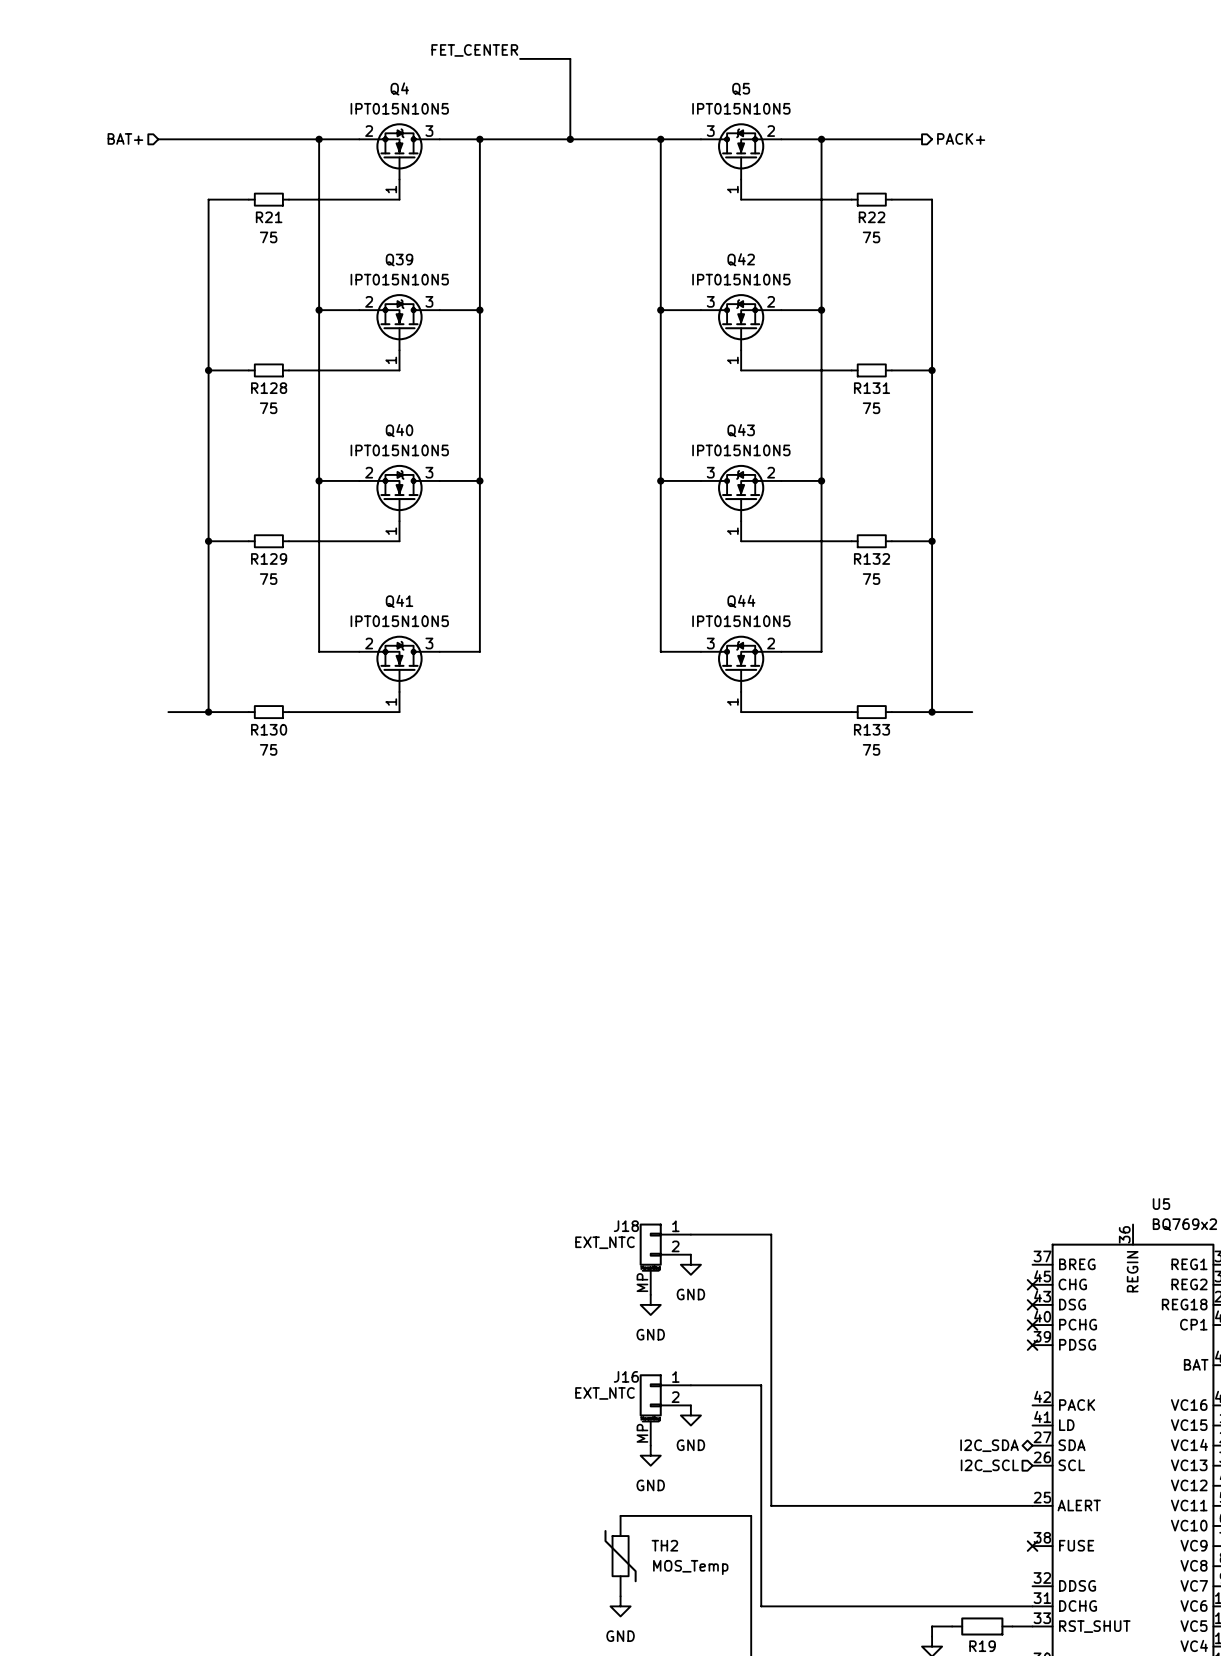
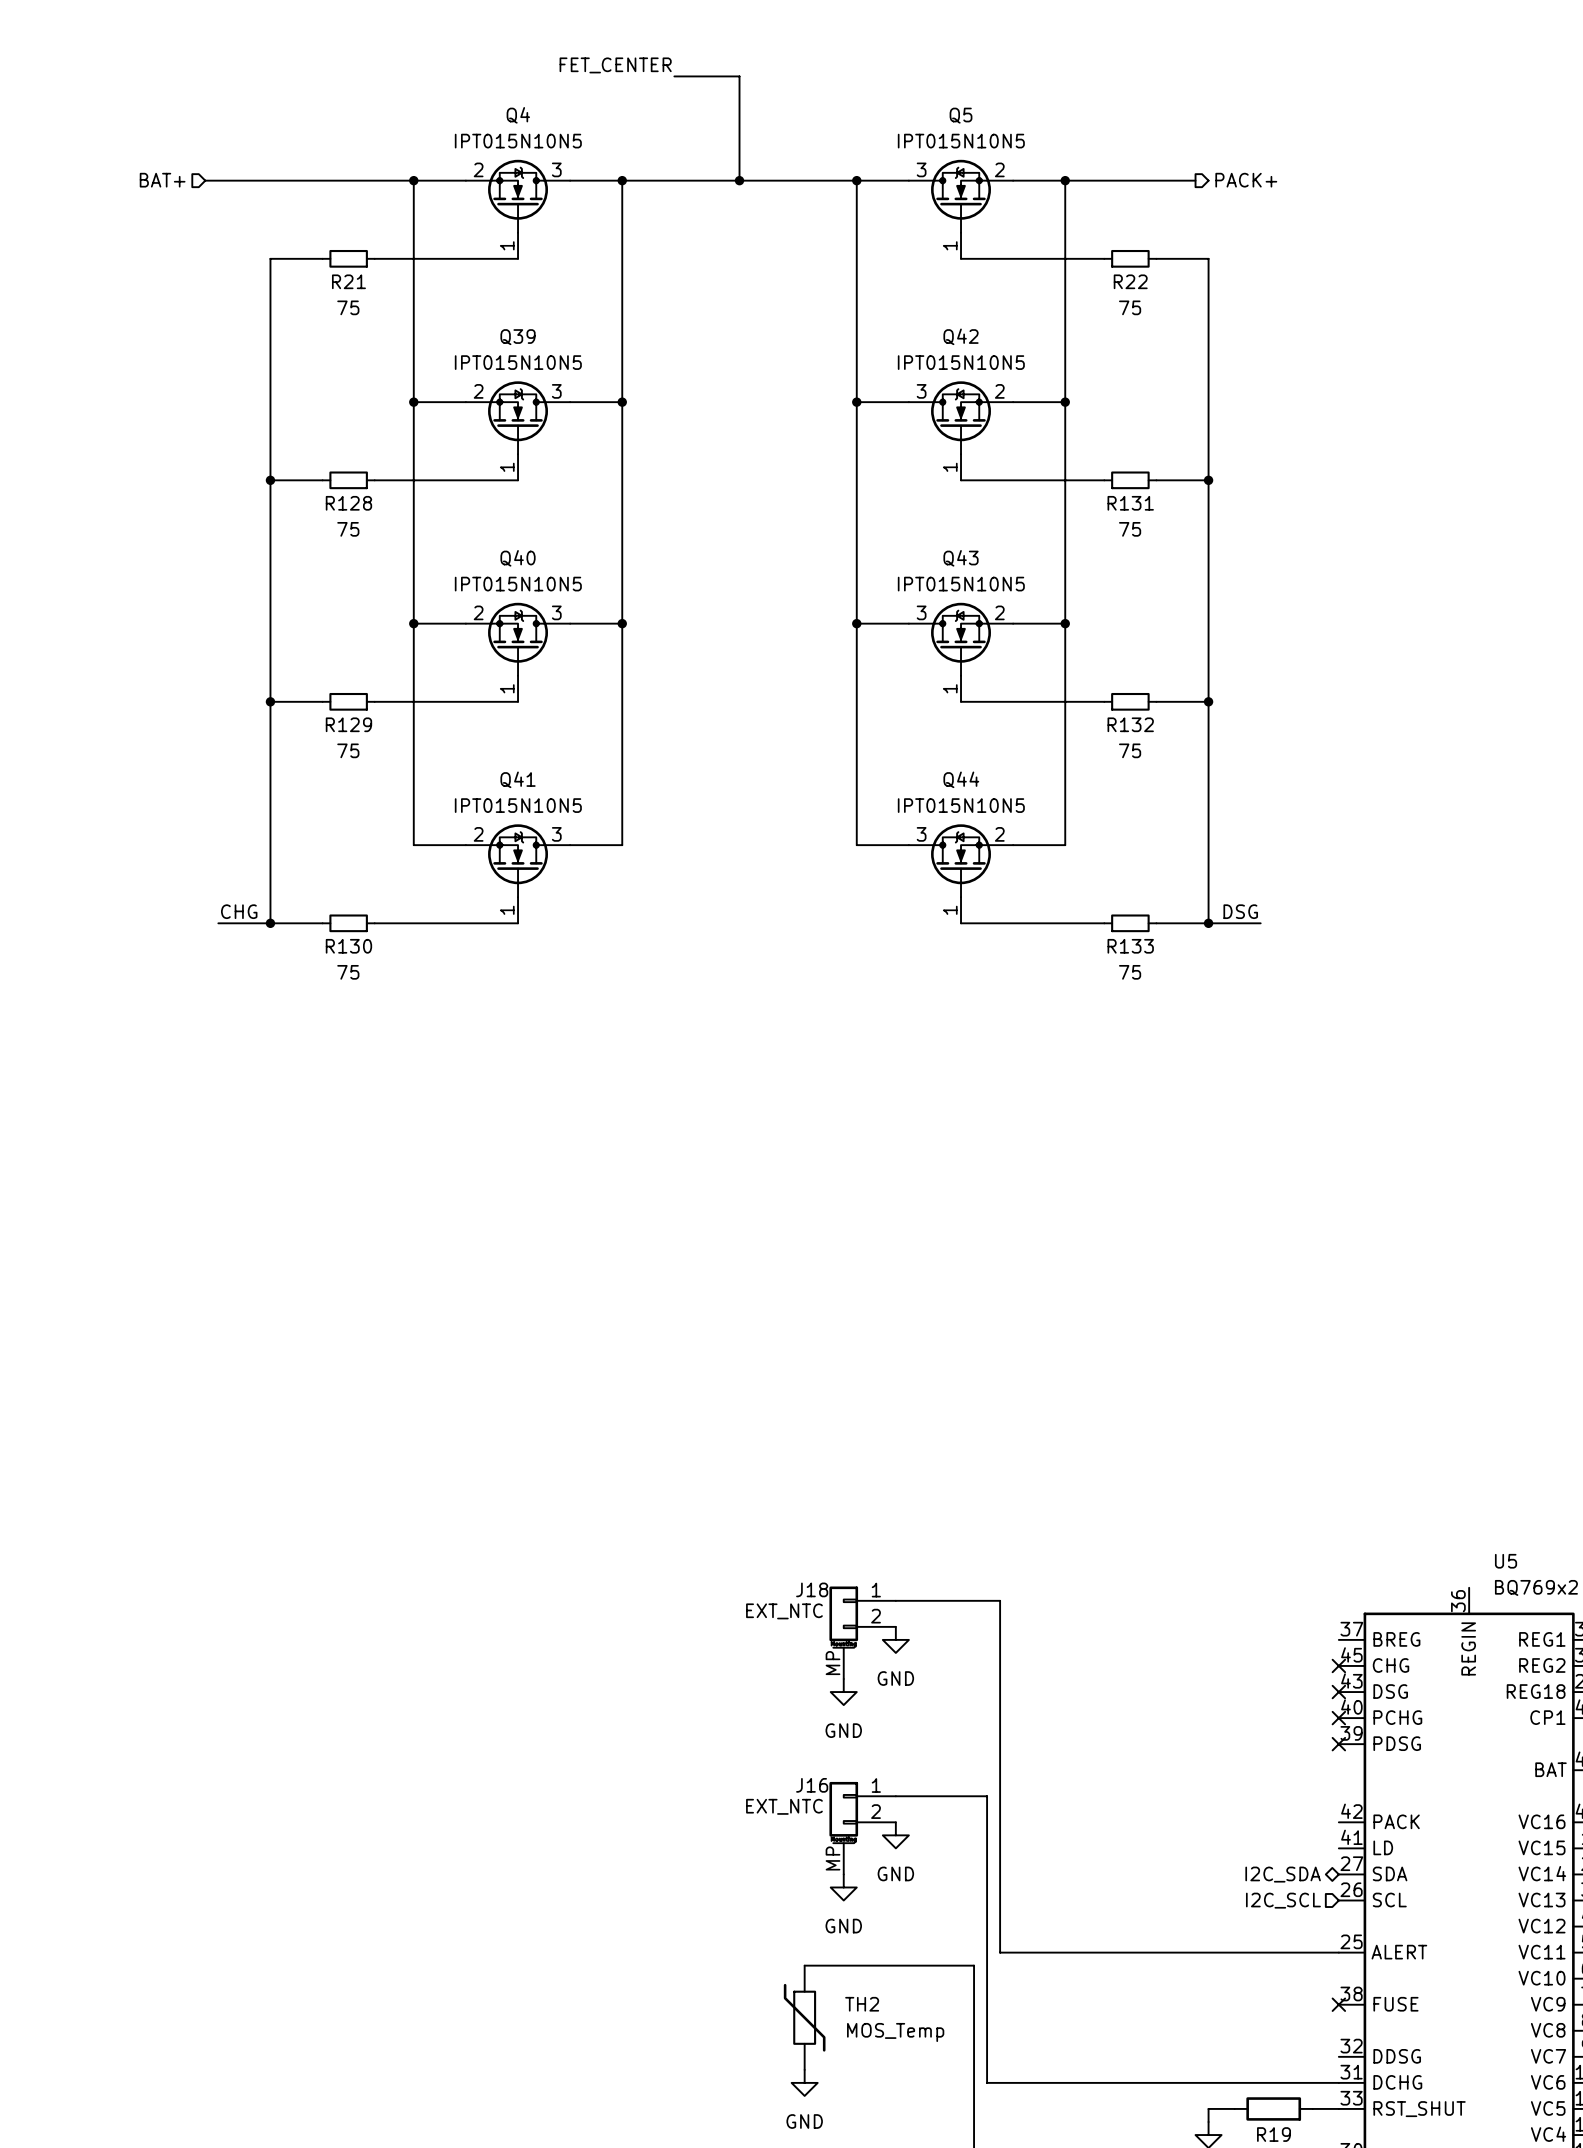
label: none -> CHG (239, 911)
label: none -> DSG (1240, 911)

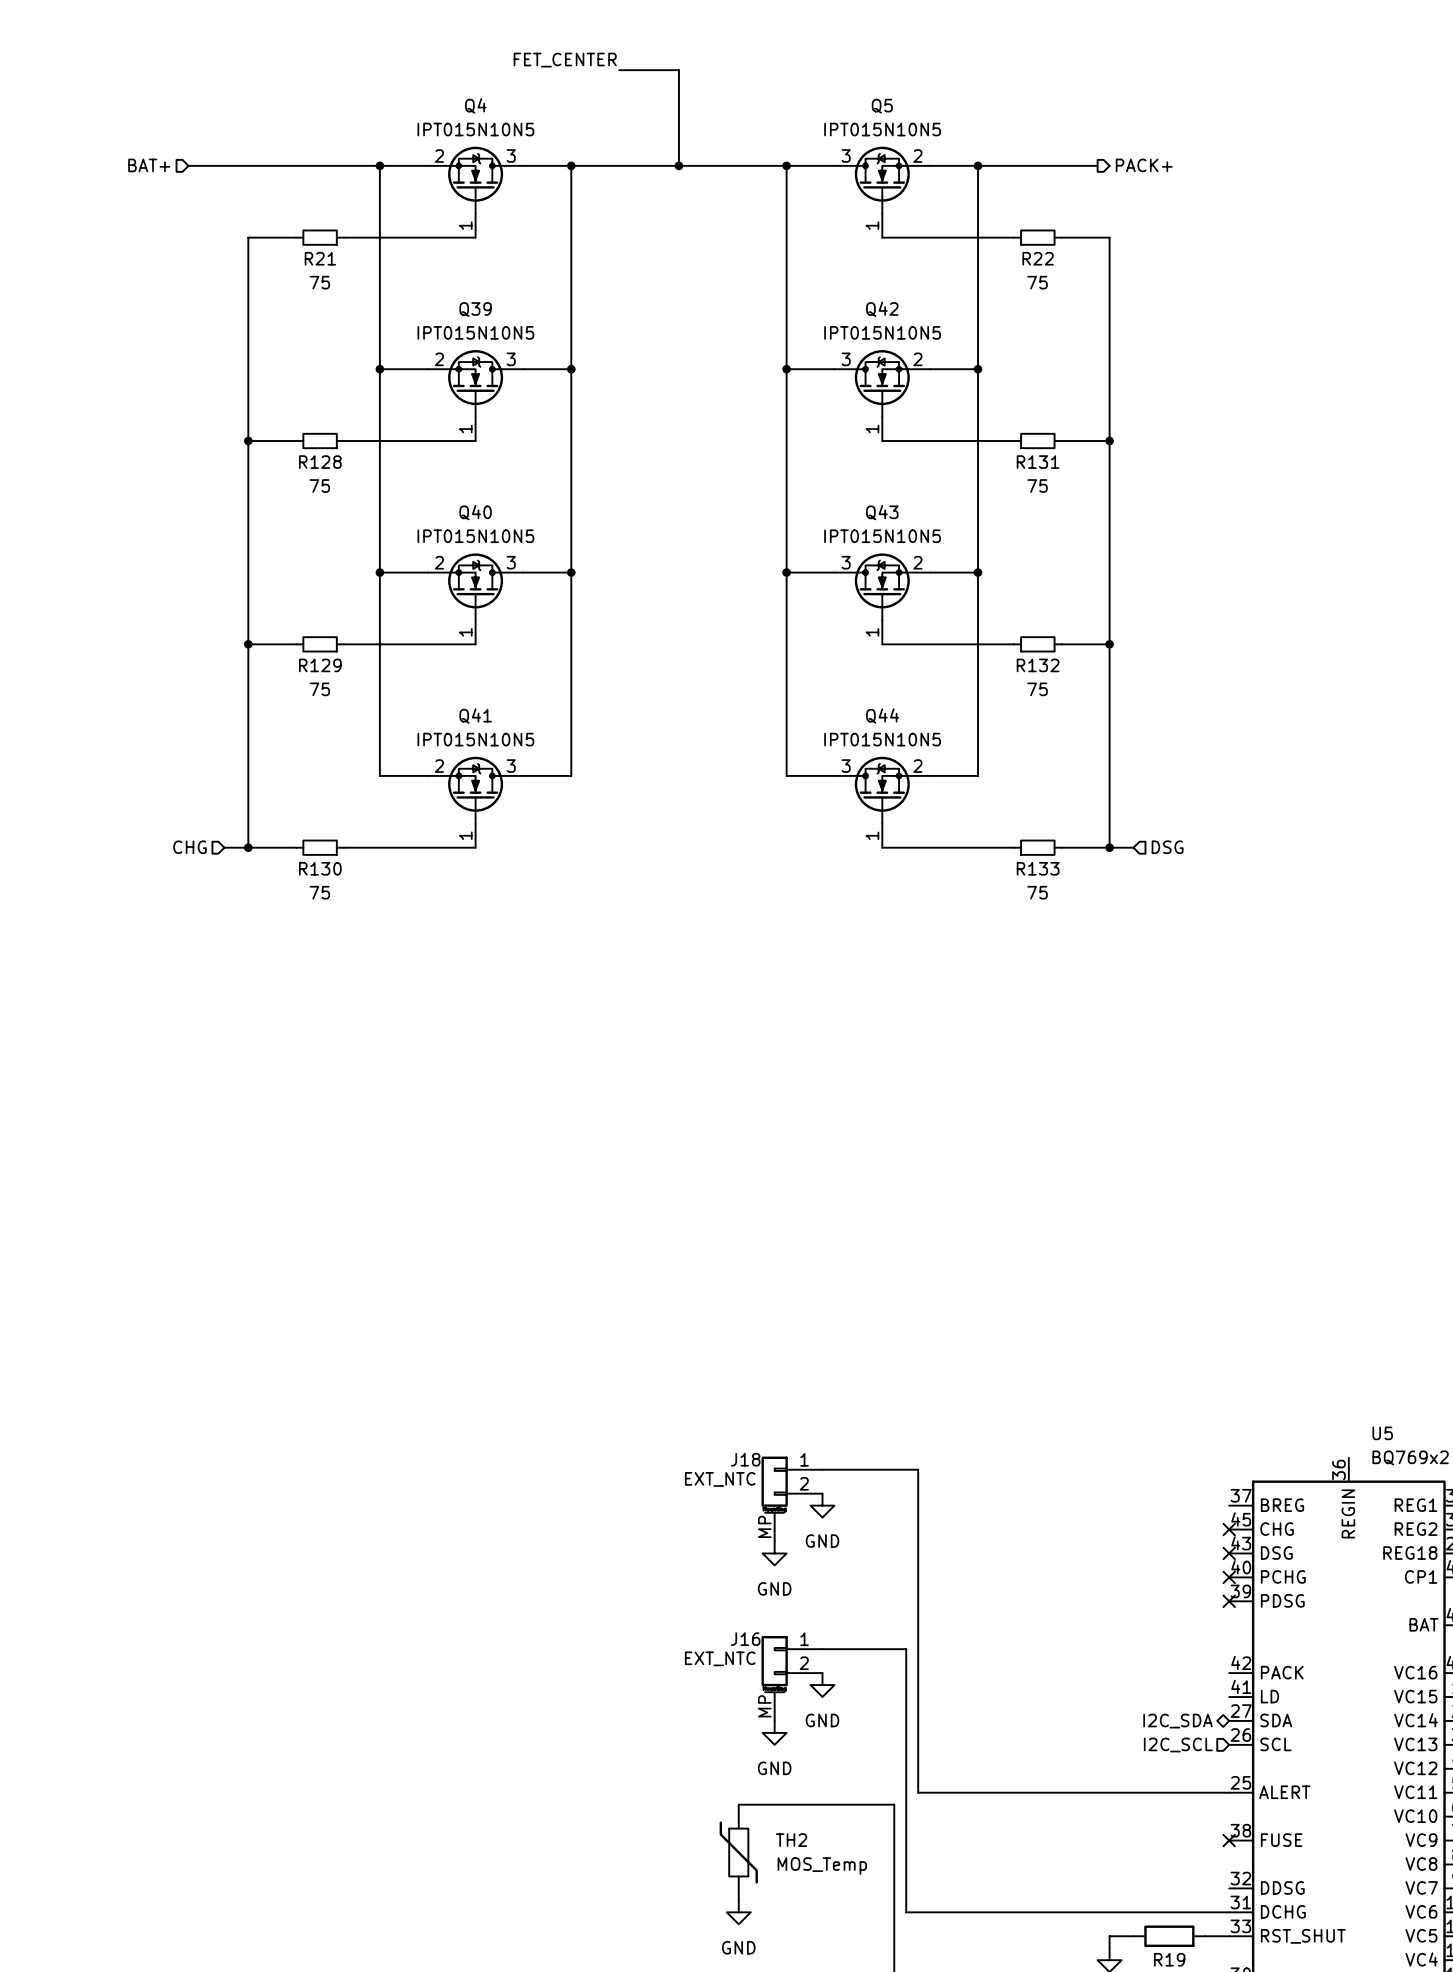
label: CHG (239, 911) -> none
label: DSG (1240, 911) -> none
hierarchical label: none -> CHG (190, 847)
hierarchical label: none -> DSG (1167, 847)
wire: (218, 923) (244, 923) -> none
wire: (1234, 923) (1260, 923) -> none

